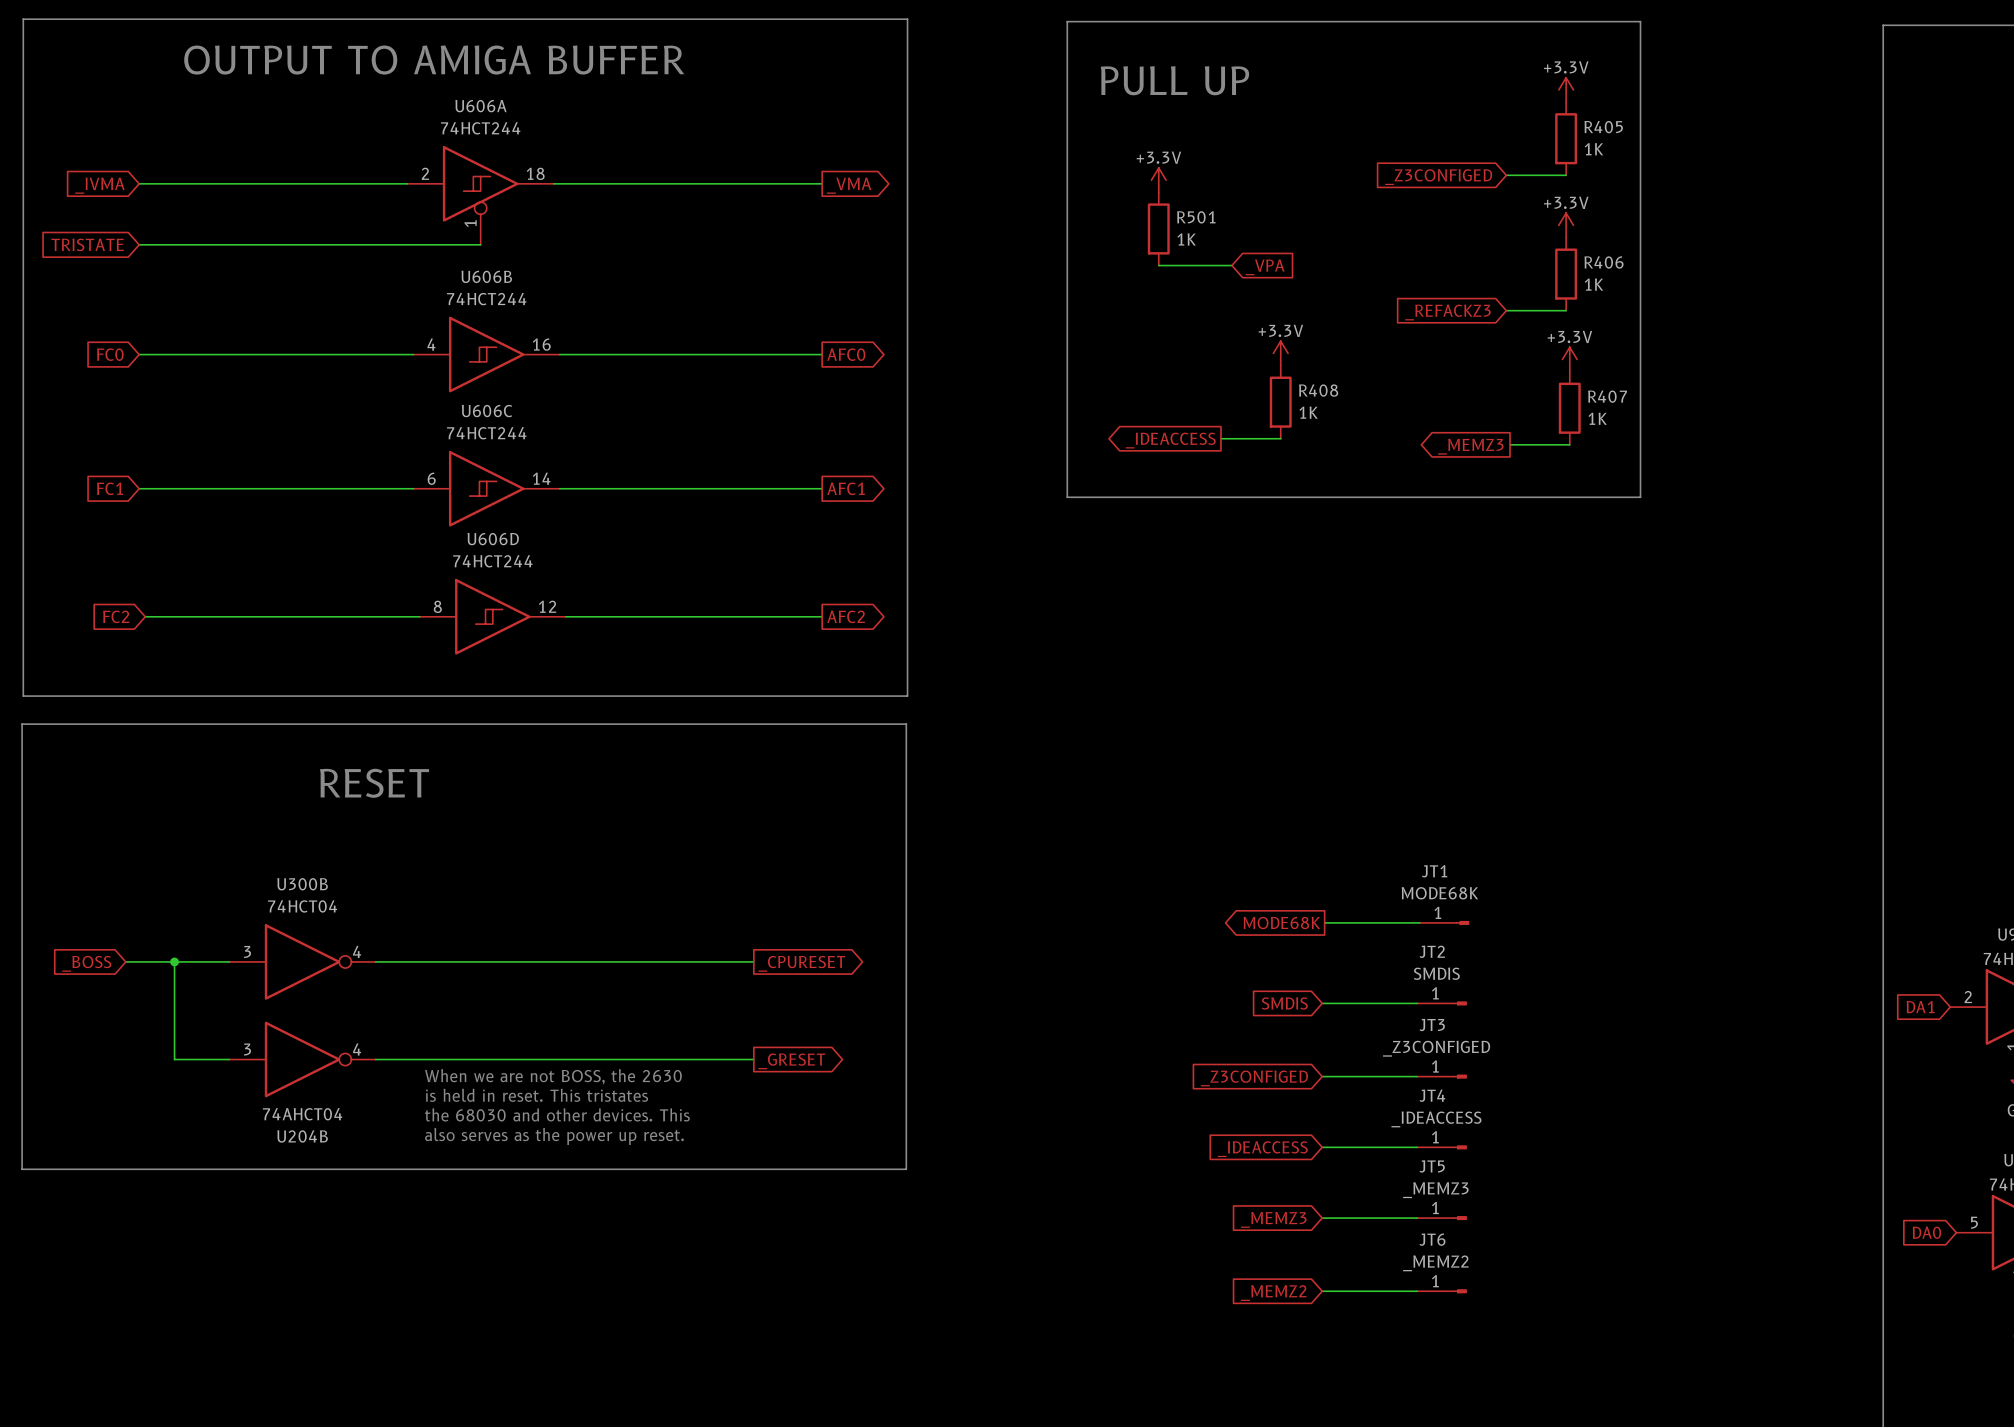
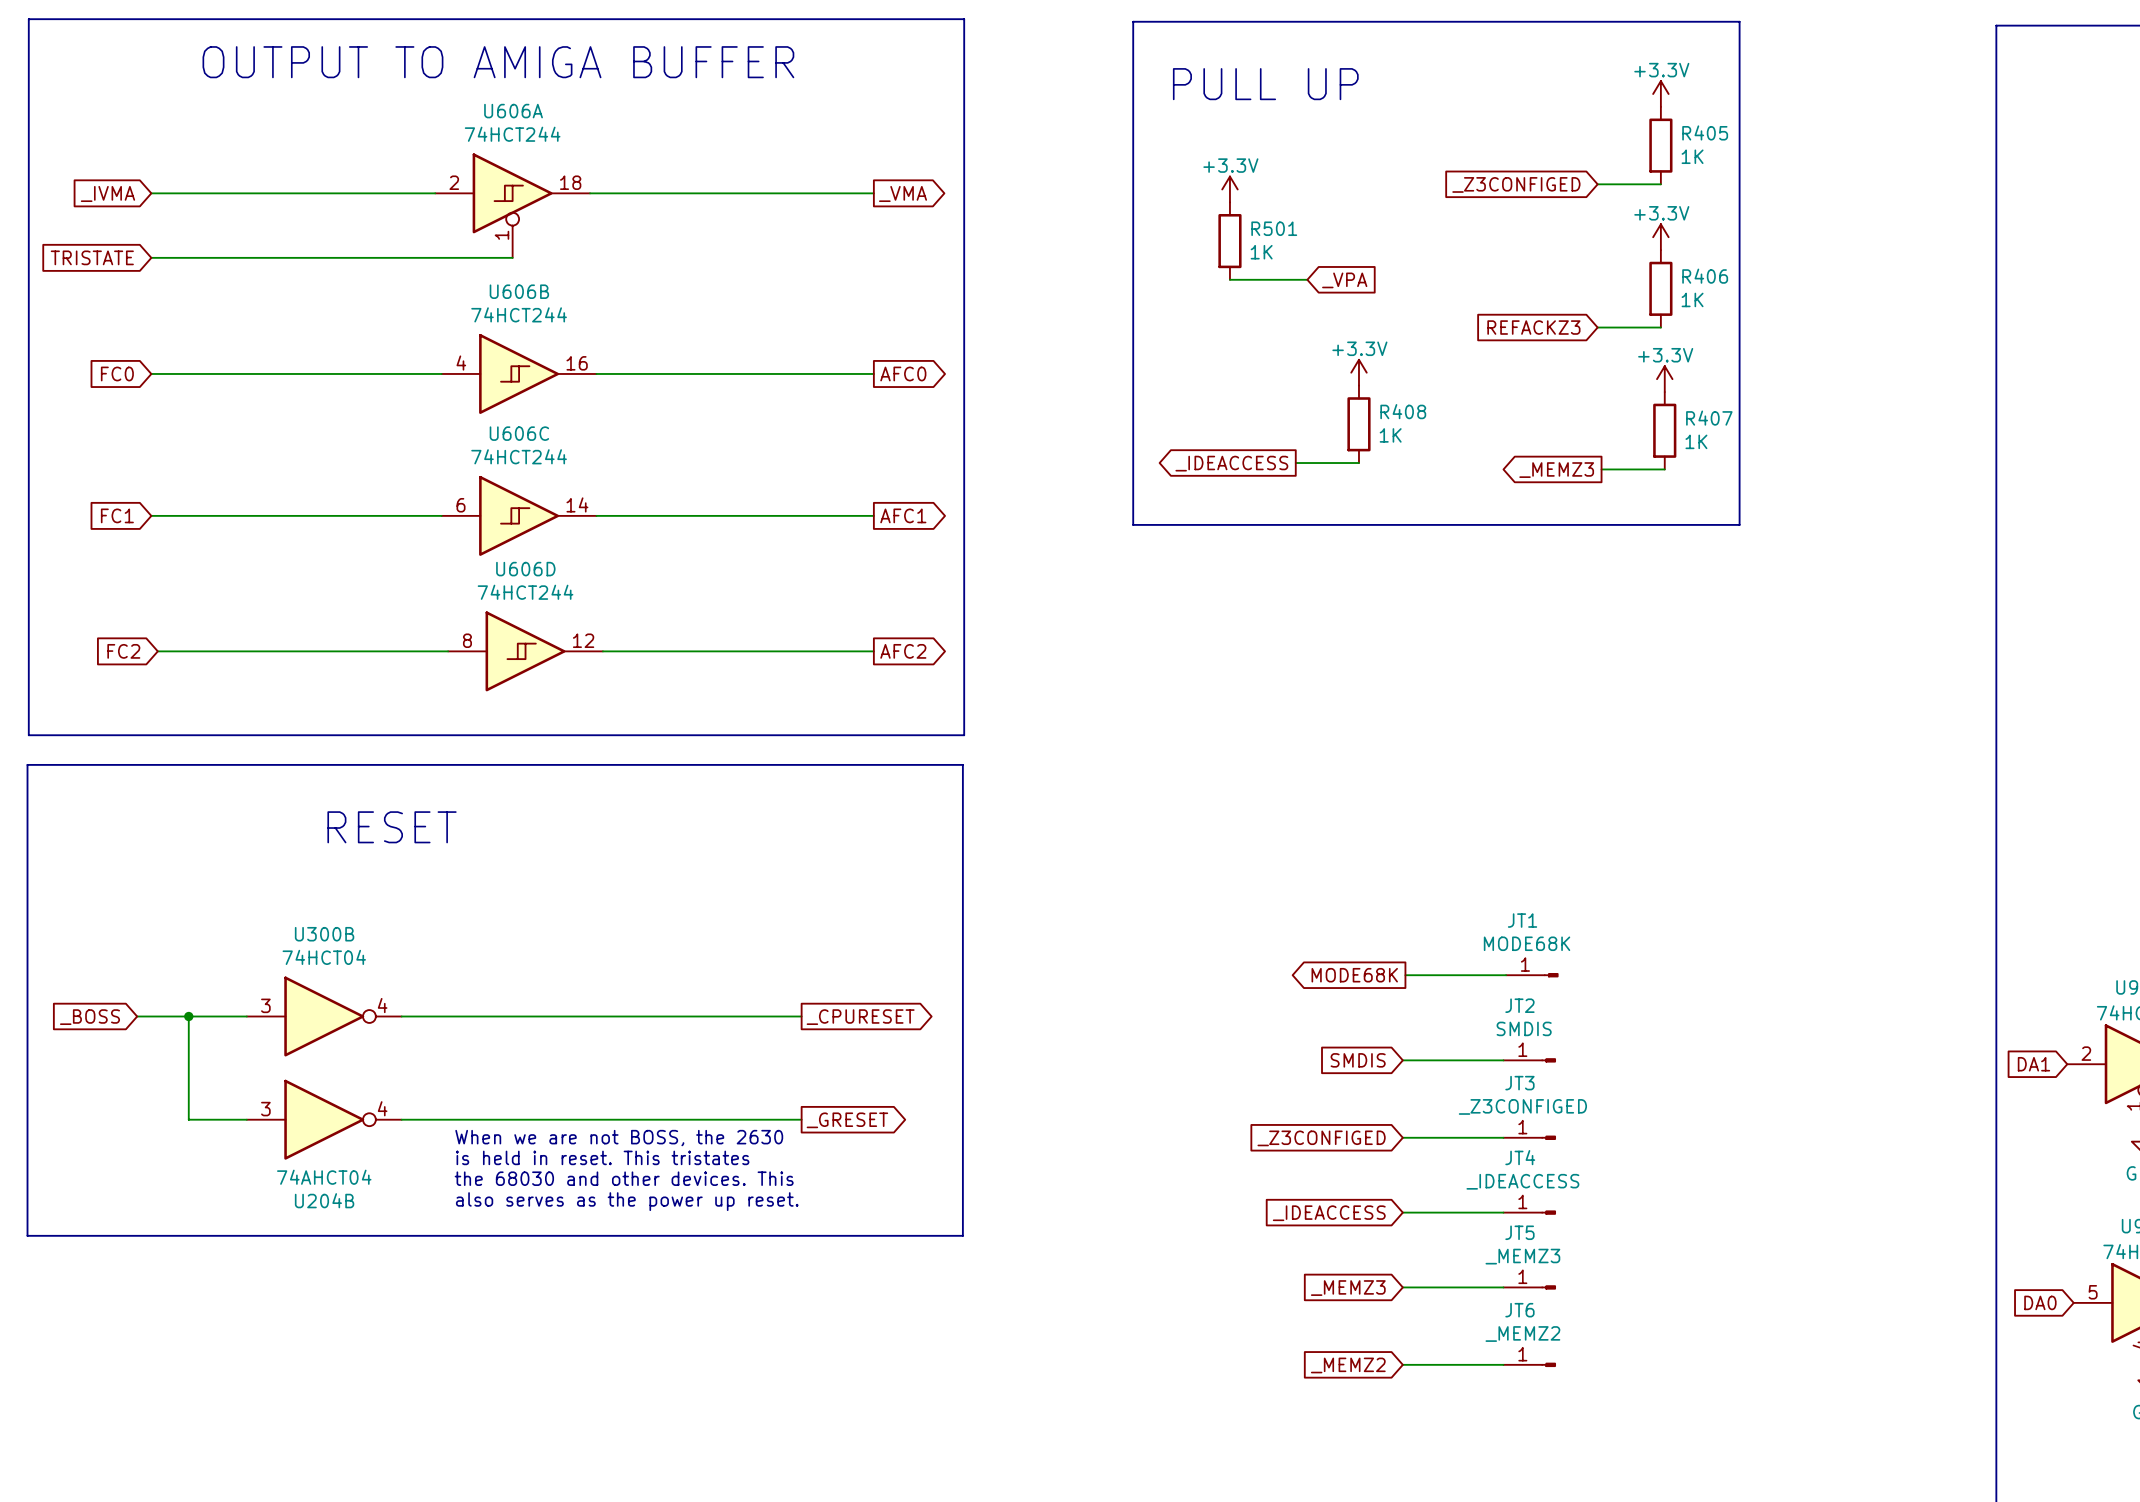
global label: _REFACKZ3 (1447, 312) -> REFACKZ3 (1533, 327)

